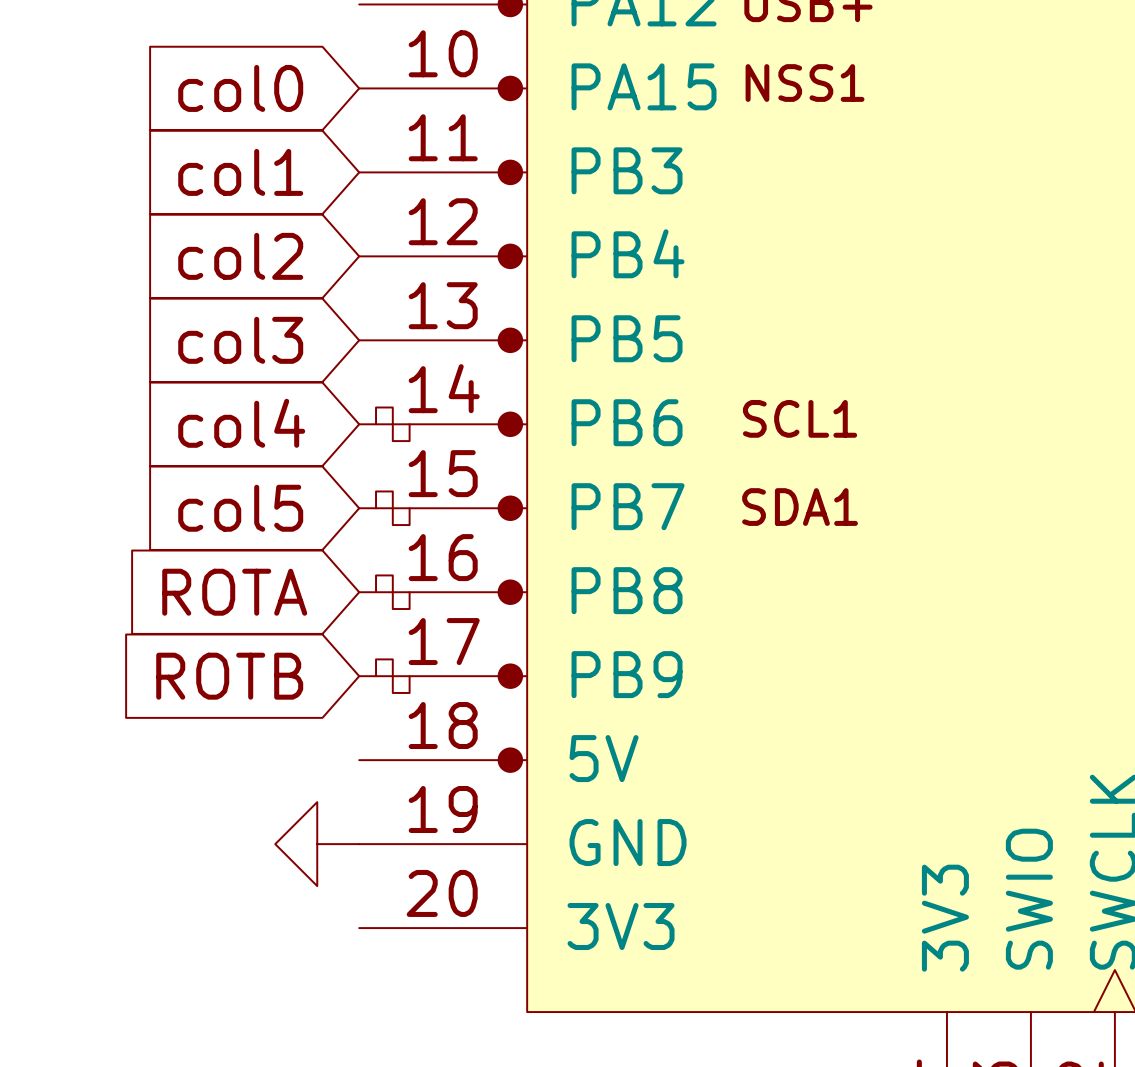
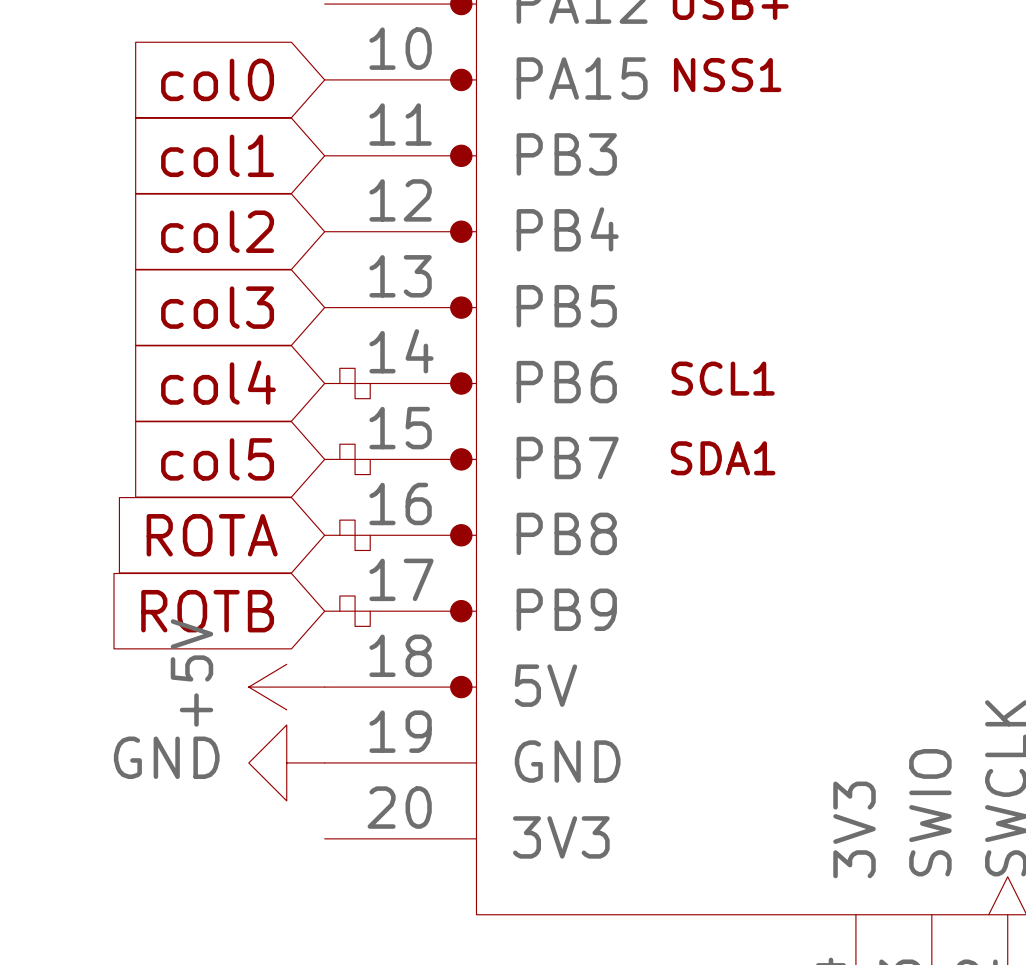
power symbol: none -> +5V (286, 687)
power symbol text: none -> GND (166, 757)

